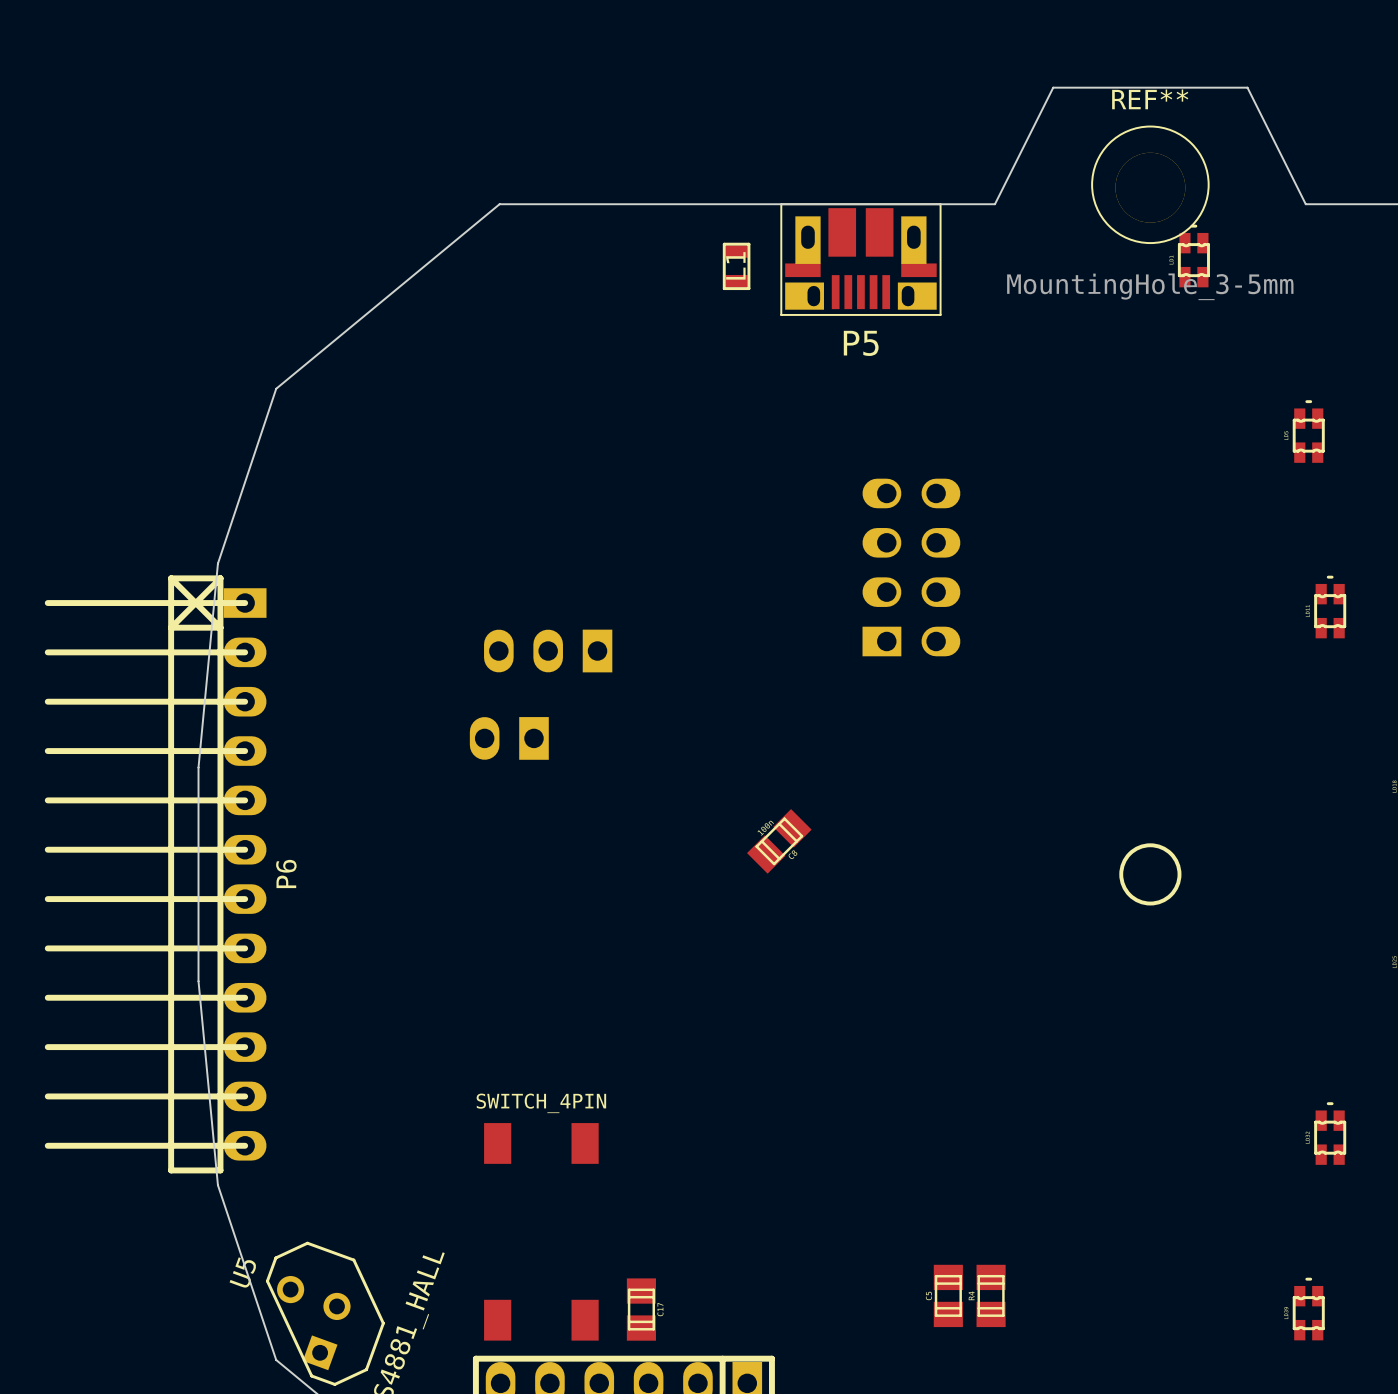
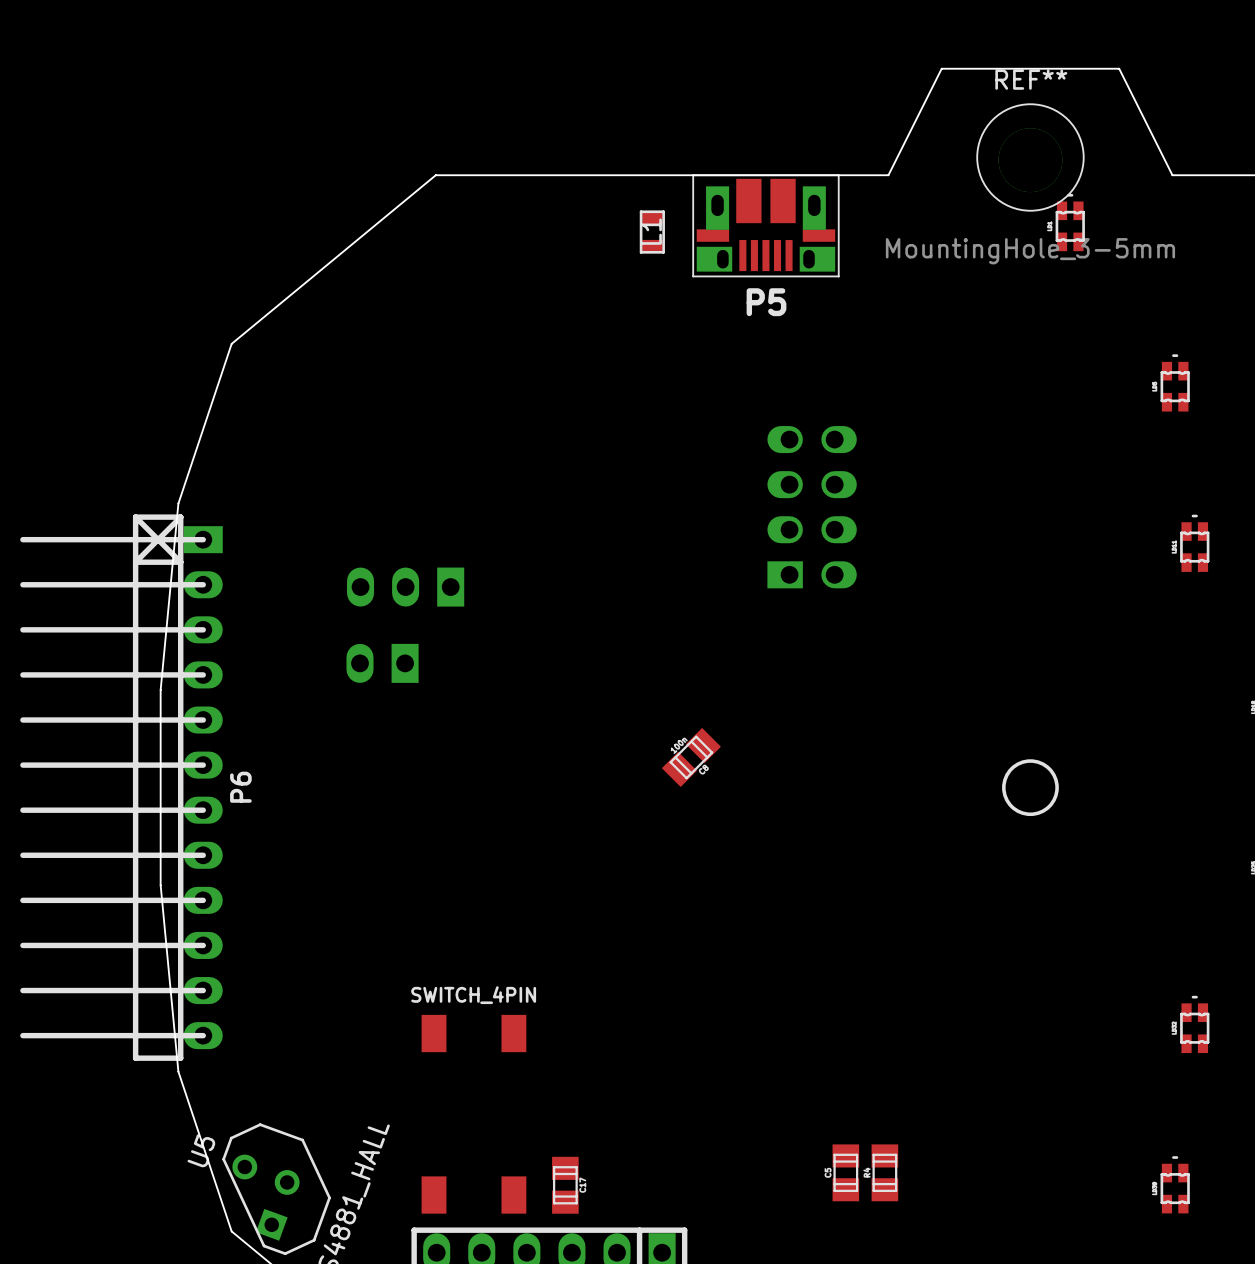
part position: (548, 651) -> (405, 587)
part position: (509, 738) -> (382, 663)

